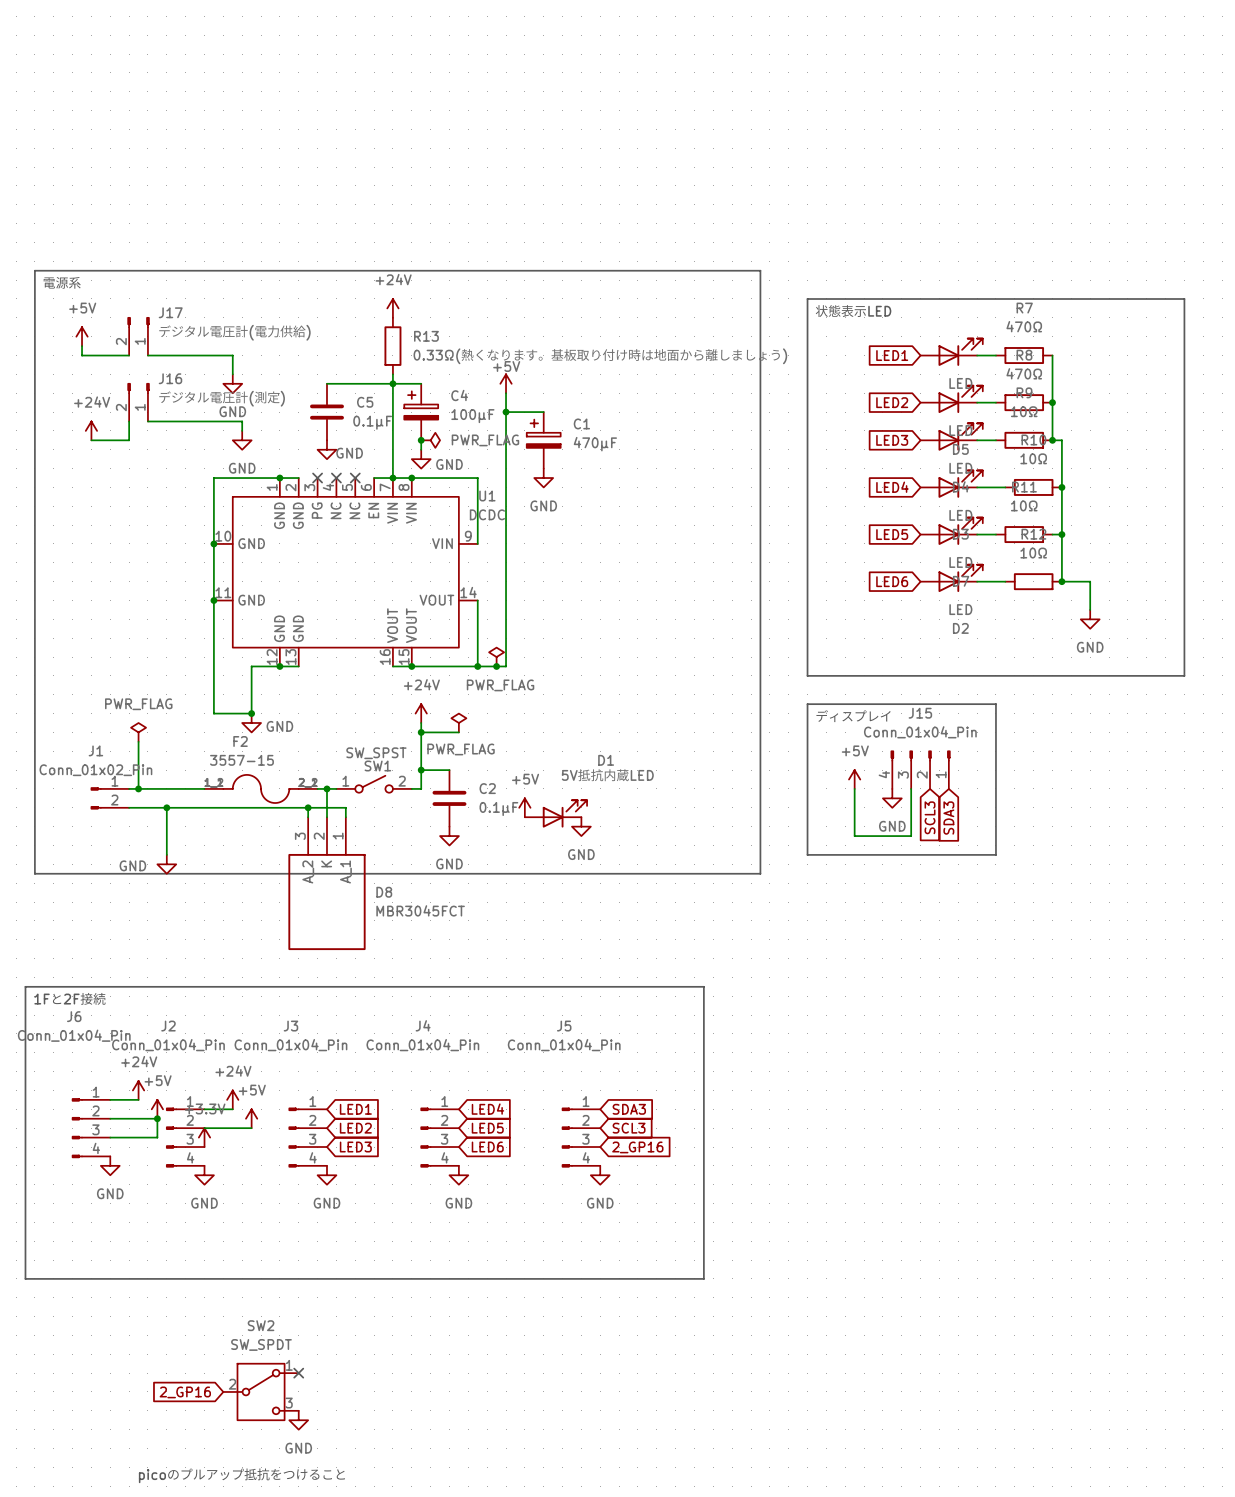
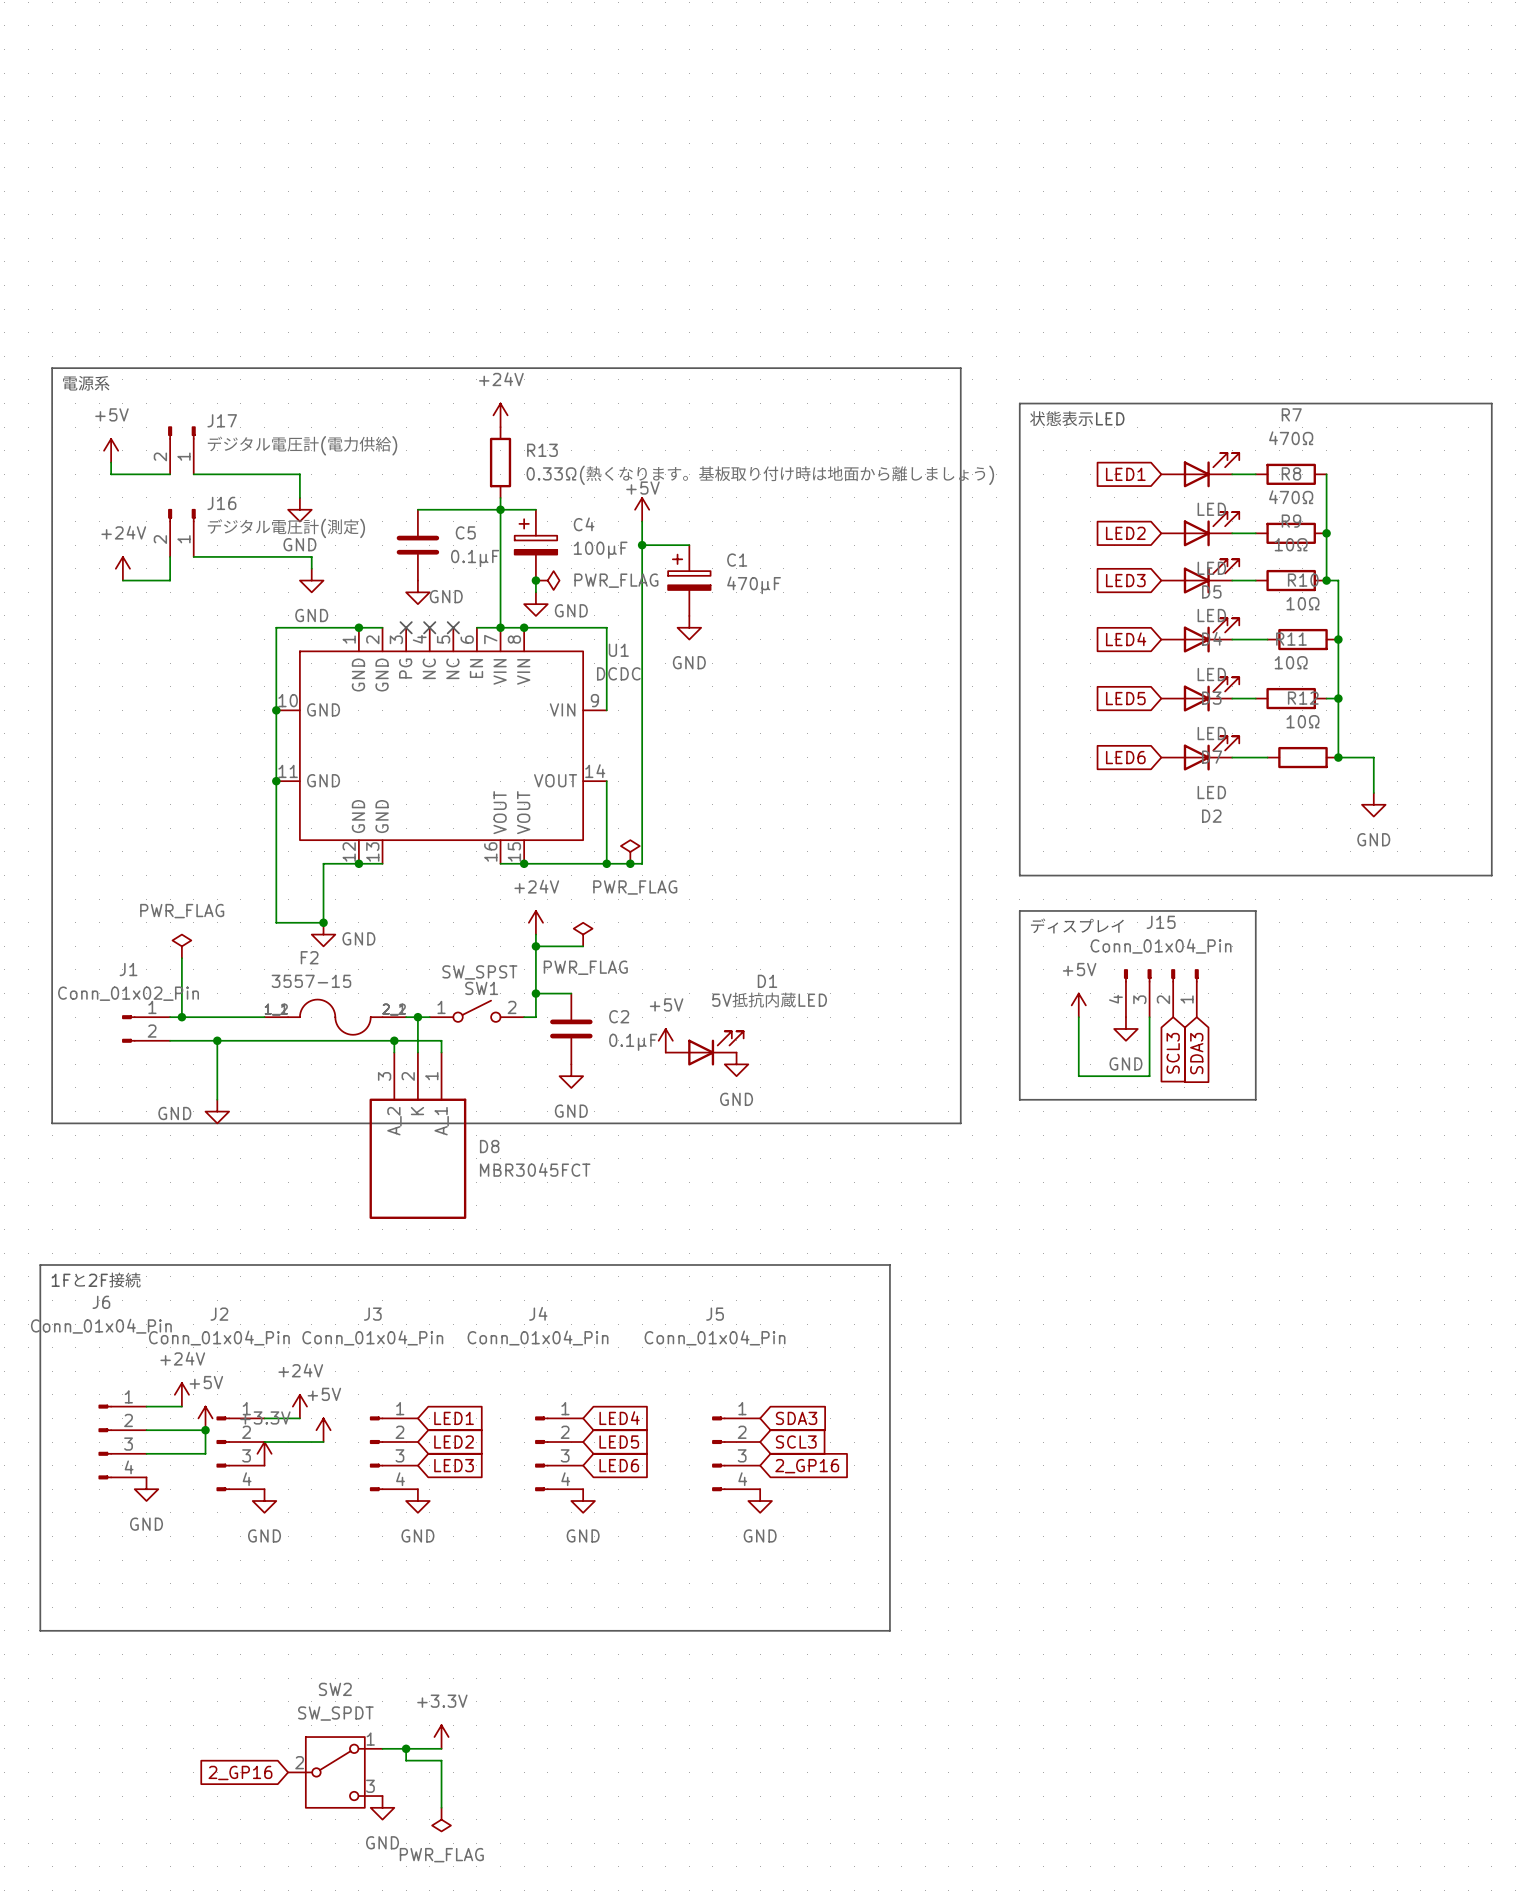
power symbol: none -> +3.3V (441, 1737)
wire: none -> (382, 1748) (441, 1748)
no-connect mark: (298, 1373) -> none
wire: none -> (406, 1748) (406, 1760) (441, 1760) (441, 1807)
junction: none -> (406, 1748)
power symbol: none -> PWR_FLAG (441, 1819)
text: picoのプルアップ抵抗をつけること (242, 1475) -> none

